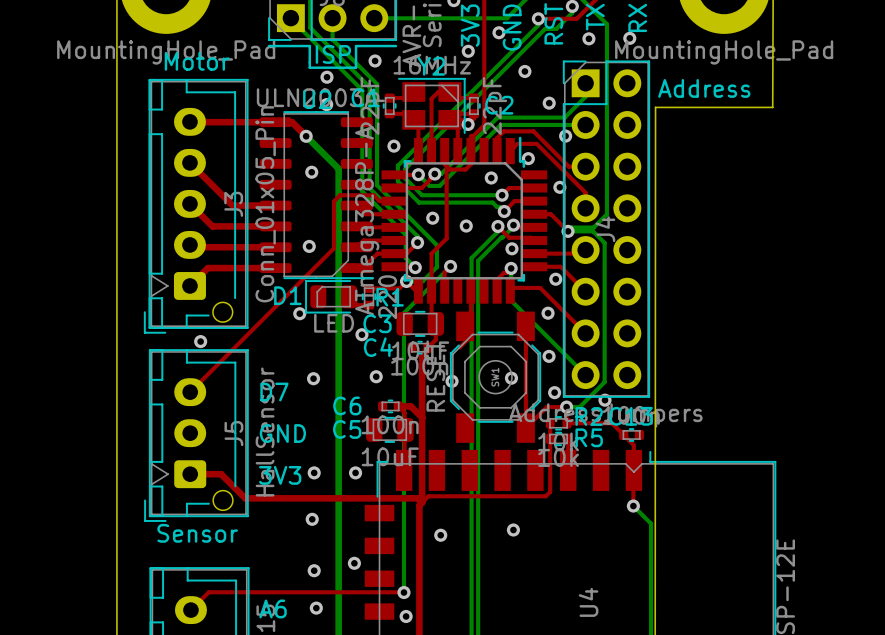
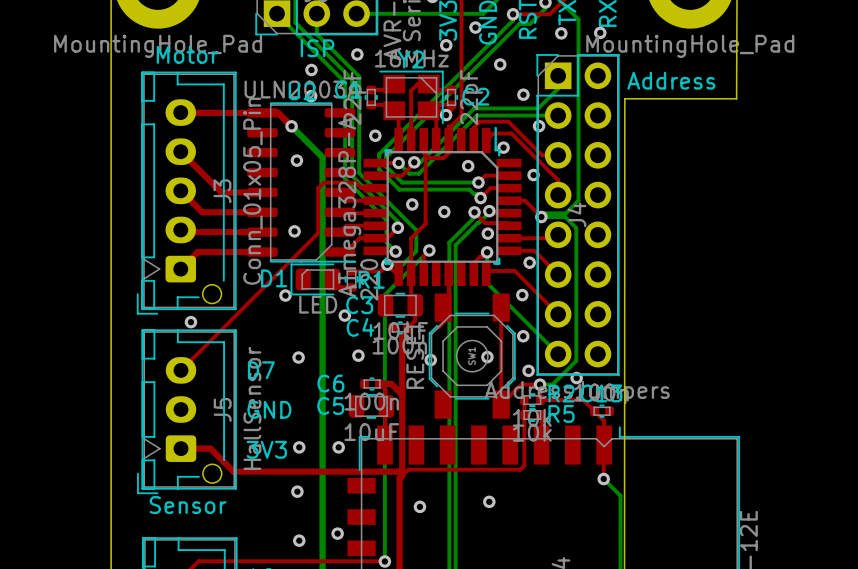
line: (269, 46) (309, 46) (309, 67) (356, 67) (356, 46) (395, 46) -> none

